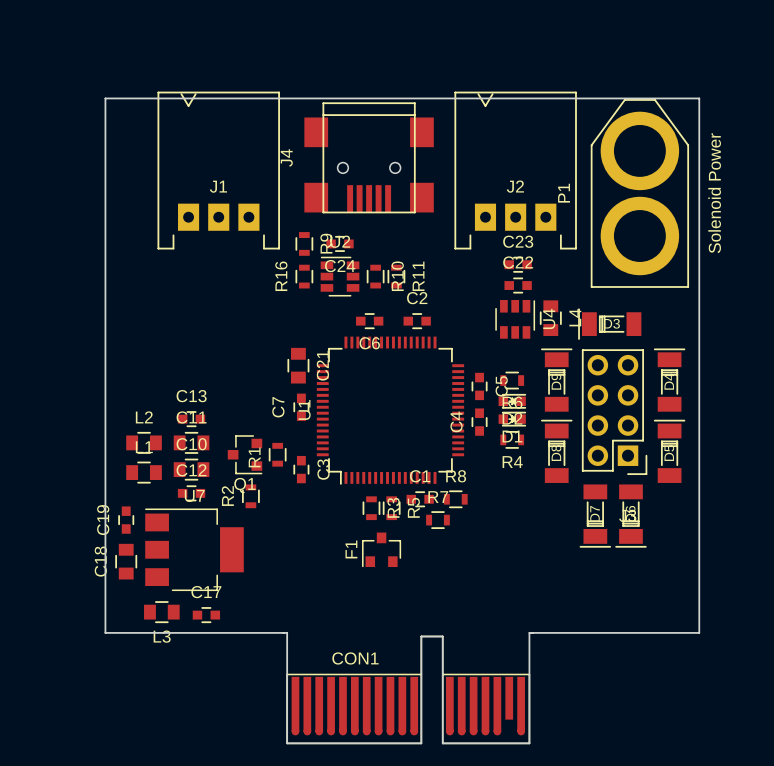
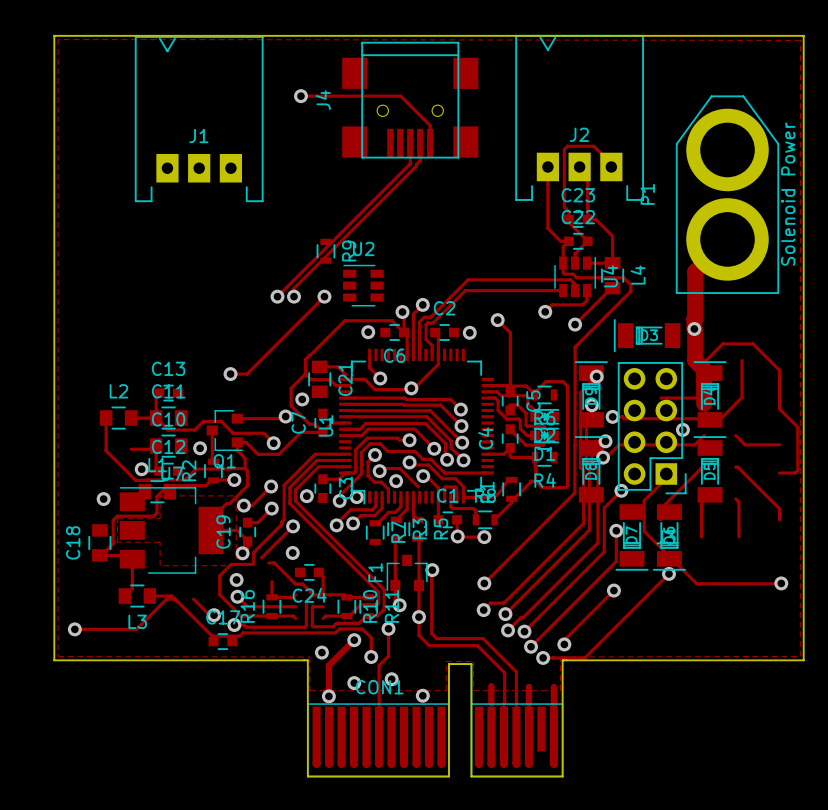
zone outline: none -> (58, 39) (800, 40) (800, 656) (560, 657) (560, 690) (473, 690) (473, 661) (446, 661) (446, 690) (309, 690) (309, 657) (58, 656) (58, 39)
track: none -> (300, 96) (400, 96) (430, 125) (430, 143)
via: none -> (300, 96)
track: none -> (410, 143) (410, 163) (277, 296)
track: none -> (420, 143) (420, 160) (416, 165) (294, 288) (294, 296)
J4 position: (369, 157) -> (410, 100)
track: none -> (547, 166) (547, 228) (560, 241) (568, 241) (563, 246) (563, 272) (572, 274) (576, 277) (623, 277) (630, 284) (630, 291) (575, 347) (574, 492) (484, 583)
track: none -> (579, 166) (587, 174) (587, 219) (595, 219) (612, 236) (612, 263) (586, 263)
track: none -> (611, 166) (611, 163) (593, 146) (567, 146) (564, 149) (564, 207) (568, 211) (568, 222) (587, 241) (575, 253) (575, 263)
J1 position: (218, 170) -> (199, 119)
J2 position: (515, 170) -> (579, 117)
P1 position: (639, 193) -> (727, 194)
P1 value position: Solenoid Power (714, 193) -> Solenoid Power (788, 194)
track: none -> (727, 239) (695, 271) (695, 360)
C24 position: (340, 243) -> (309, 572)
C23 position: (518, 264) -> (578, 219)
R16 position: (304, 276) -> (271, 606)
R10 position: (375, 276) -> (346, 606)
R11 position: (396, 276) -> (368, 606)
track: none -> (612, 288) (575, 324)
track: none -> (563, 290) (465, 290) (433, 322) (426, 324) (426, 339) (432, 345) (432, 354)
track: none -> (575, 290) (575, 284) (570, 279) (468, 279) (430, 317) (424, 317) (419, 322) (419, 354)
track: none -> (586, 290) (586, 300) (582, 304) (552, 304) (545, 311)
C22 position: (518, 285) -> (578, 241)
via: none -> (277, 296)
via: none -> (294, 296)
track: none -> (324, 296) (247, 374) (230, 374)
via: none -> (324, 296)
track: none -> (422, 304) (413, 314) (413, 354)
via: none -> (422, 304)
track: none -> (402, 312) (404, 332)
via: none -> (402, 312)
via: none -> (545, 311)
track: none -> (497, 320) (510, 332) (509, 386)
via: none -> (497, 320)
via: none -> (575, 324)
via: none -> (694, 329)
L4 position: (550, 318) -> (612, 275)
U4 position: (515, 319) -> (575, 276)
via: none -> (368, 332)
track: none -> (404, 332) (391, 320) (344, 320) (305, 359) (305, 374)
track: none -> (404, 332) (407, 335) (407, 354)
track: none -> (435, 332) (438, 335) (438, 364) (413, 389) (374, 389) (364, 379) (345, 379) (345, 374) (337, 366) (319, 366)
via: none -> (469, 332)
track: none -> (369, 354) (369, 367) (380, 378)
track: none -> (695, 360) (706, 360) (722, 343) (753, 343) (779, 370) (779, 409) (797, 427) (797, 470) (795, 472) (779, 472)
track: none -> (695, 360) (704, 369) (704, 403) (698, 398) (660, 398)
track: none -> (742, 360) (742, 397) (720, 418) (624, 418) (622, 416) (612, 416)
via: none -> (230, 374)
track: none -> (305, 374) (291, 388) (291, 405) (309, 424) (314, 424) (322, 432)
track: none -> (305, 374) (311, 379) (330, 379) (335, 385) (345, 385)
track: none -> (596, 376) (580, 392) (580, 467) (583, 470) (583, 523) (504, 603) (490, 603) (483, 610)
via: none -> (596, 376)
via: none -> (380, 378)
track: none -> (487, 385) (509, 386)
track: none -> (509, 386) (526, 386) (535, 394) (535, 392) (545, 381) (563, 381) (567, 386) (567, 485) (565, 487) (542, 487) (535, 481)
via: none -> (411, 388)
track: none -> (487, 391) (497, 391) (501, 395) (527, 395) (527, 403) (535, 411) (535, 416)
track: none -> (159, 393) (156, 396) (156, 418)
track: none -> (345, 398) (450, 399) (460, 409)
track: none -> (487, 398) (495, 398) (498, 400) (498, 410) (506, 419) (518, 419) (520, 428) (527, 435) (535, 435)
via: none -> (302, 399)
track: none -> (345, 404) (440, 405) (461, 426)
track: none -> (509, 404) (517, 404) (526, 413) (527, 426) (544, 427) (544, 443) (525, 445) (510, 429)
track: none -> (591, 405) (591, 415) (586, 420) (586, 465) (589, 468) (589, 530) (505, 614)
via: none -> (591, 405)
via: none -> (460, 409)
track: none -> (345, 410) (430, 410) (462, 442)
track: none -> (285, 416) (283, 418) (237, 418)
via: none -> (285, 416)
track: none -> (345, 416) (426, 416) (451, 441) (451, 447) (463, 460)
via: none -> (612, 416)
track: none -> (106, 418) (106, 450) (135, 480) (185, 479) (196, 469) (245, 468)
track: none -> (131, 418) (156, 418)
track: none -> (156, 418) (168, 429) (194, 429) (203, 421) (221, 421) (233, 433) (263, 433) (273, 443)
track: none -> (345, 423) (332, 423) (322, 432)
via: none -> (461, 426)
track: none -> (345, 429) (360, 429) (365, 423) (425, 423) (445, 443) (445, 458) (447, 459)
via: none -> (682, 429)
track: none -> (212, 430) (212, 460)
track: none -> (322, 432) (300, 432) (279, 454) (257, 454) (246, 442) (237, 442) (237, 450) (245, 458) (245, 468)
C13 position: (191, 419) -> (168, 393)
track: none -> (345, 435) (361, 435) (368, 429) (414, 429) (434, 448)
track: none -> (704, 435) (694, 444) (619, 444) (606, 457) (603, 457)
track: none -> (735, 435) (745, 444) (779, 444)
track: none -> (409, 440) (367, 438) (355, 449) (354, 472) (345, 472) (339, 479) (322, 479)
via: none -> (409, 440)
track: none -> (605, 441) (595, 441) (592, 444) (591, 462) (597, 468) (597, 542) (508, 630)
via: none -> (605, 441)
via: none -> (462, 442)
via: none -> (273, 443)
via: none -> (200, 448)
via: none -> (434, 448)
track: none -> (131, 449) (152, 449) (156, 446) (156, 467) (159, 471) (143, 471) (141, 469)
track: none -> (345, 454) (315, 454) (284, 485) (284, 519) (281, 524) (253, 552) (253, 563) (231, 564) (219, 575) (219, 594) (240, 616) (293, 616) (295, 618)
track: none -> (487, 454) (503, 454) (510, 448) (511, 457) (535, 457) (535, 481)
track: none -> (374, 455) (368, 462) (368, 475) (374, 482) (381, 482) (388, 489) (388, 497)
via: none -> (374, 455)
via: none -> (603, 457)
L2 position: (144, 442) -> (118, 418)
C11 position: (191, 442) -> (168, 418)
track: none -> (345, 460) (316, 460) (289, 487) (289, 503) (378, 592) (378, 603) (360, 604) (349, 616) (325, 616) (323, 618)
via: none -> (447, 459)
via: none -> (463, 460)
track: none -> (409, 462) (412, 465) (428, 465) (442, 478) (455, 478) (463, 486) (463, 497) (494, 497) (502, 488) (502, 486) (511, 480)
via: none -> (409, 462)
track: none -> (345, 466) (318, 466) (295, 489) (295, 501) (384, 589) (384, 609) (377, 616) (366, 616) (358, 623) (336, 623) (333, 626) (313, 626) (312, 607) (323, 606)
track: none -> (704, 467) (660, 508) (660, 519)
track: none -> (735, 467) (779, 508) (779, 519)
track: none -> (245, 468) (247, 470) (247, 485) (211, 519) (211, 530) (237, 530) (247, 541) (247, 549) (242, 553)
via: none -> (141, 469)
track: none -> (379, 471) (382, 468) (399, 468) (418, 486)
via: none -> (379, 471)
Q1 position: (245, 454) -> (224, 430)
R1 position: (277, 454) -> (511, 489)
track: none -> (487, 472) (444, 472) (430, 459) (422, 459) (414, 451) (387, 451) (380, 443) (370, 443) (361, 452) (361, 473) (340, 494) (340, 501)
track: none -> (660, 472) (660, 483) (644, 500) (644, 531) (696, 583) (781, 583)
track: none -> (423, 476) (426, 476) (438, 487) (438, 519)
via: none -> (423, 476)
track: none -> (234, 480) (210, 480) (205, 485) (200, 485)
via: none -> (234, 480)
via: none -> (396, 481)
track: none -> (535, 481) (530, 481) (514, 498) (511, 498) (511, 502) (494, 519) (494, 517)
track: none -> (200, 485) (167, 485) (156, 496) (156, 513) (153, 516) (117, 516) (113, 520) (113, 543) (101, 555)
track: none -> (271, 486) (252, 505) (243, 505)
via: none -> (271, 486)
C10 position: (191, 469) -> (168, 446)
track: none -> (621, 490) (604, 507) (604, 551) (524, 631)
via: none -> (621, 490)
zone outline: none -> (160, 495) (160, 518) (117, 518) (117, 542) (160, 542) (160, 565) (236, 565) (236, 495) (160, 495)
via: none -> (306, 496)
via: none -> (356, 497)
track: none -> (375, 497) (375, 506) (372, 509) (350, 509) (336, 525)
track: none -> (382, 497) (382, 508) (374, 515) (360, 515) (353, 523)
track: none -> (400, 497) (400, 506) (395, 512) (388, 512) (377, 523) (375, 523)
track: none -> (407, 497) (407, 509) (396, 519)
track: none -> (413, 497) (413, 515) (417, 519)
track: none -> (444, 497) (445, 486) (455, 486) (457, 497)
track: none -> (450, 497) (452, 508) (473, 508) (475, 511) (475, 519)
via: none -> (103, 499)
track: none -> (704, 498) (701, 501) (701, 537)
track: none -> (735, 498) (738, 502) (738, 537)
via: none -> (339, 500)
via: none -> (243, 505)
track: none -> (271, 508) (257, 522) (247, 522)
via: none -> (271, 508)
C12 position: (191, 493) -> (168, 471)
R2 position: (250, 496) -> (213, 471)
track: none -> (457, 519) (458, 537) (484, 537)
track: none -> (295, 523) (261, 557)
via: none -> (353, 523)
via: none -> (336, 525)
via: none -> (293, 526)
track: none -> (616, 530) (616, 561) (531, 646)
via: none -> (616, 530)
via: none -> (457, 536)
via: none -> (484, 537)
track: none -> (396, 538) (395, 600) (399, 605)
track: none -> (417, 538) (419, 635) (429, 645) (477, 645) (504, 672) (503, 735)
C19 position: (126, 520) -> (247, 532)
R7 rotation: 0° (437, 520) -> 90° clockwise (375, 532)
R7 position: (437, 520) -> (375, 532)
via: none -> (292, 552)
via: none -> (242, 553)
track: none -> (99, 555) (128, 555) (132, 559) (132, 588) (124, 596)
track: none -> (268, 563) (274, 563) (295, 584) (302, 584) (313, 594)
track: none -> (432, 570) (431, 633) (436, 638) (483, 638) (516, 671) (516, 735)
via: none -> (432, 570)
U7 position: (194, 549) -> (171, 530)
track: none -> (318, 572) (323, 576) (323, 594)
track: none -> (668, 573) (584, 657) (543, 657)
via: none -> (668, 573)
via: none -> (236, 579)
track: none -> (271, 581) (271, 597) (293, 597) (295, 594)
via: none -> (484, 583)
via: none -> (781, 583)
C18 position: (126, 561) -> (99, 542)
track: none -> (613, 590) (564, 640) (564, 644)
via: none -> (613, 590)
track: none -> (313, 594) (306, 601) (305, 627) (246, 627) (244, 625) (234, 625)
track: none -> (313, 594) (368, 597)
track: none -> (149, 596) (171, 596) (174, 599)
track: none -> (237, 596) (247, 606) (295, 606)
via: none -> (237, 596)
track: none -> (193, 599) (209, 615) (214, 615)
via: none -> (399, 605)
via: none -> (483, 610)
via: none -> (505, 614)
via: none -> (214, 615)
via: none -> (419, 617)
via: none -> (234, 625)
track: none -> (388, 628) (388, 656) (379, 665) (379, 735)
via: none -> (388, 628)
track: none -> (74, 629) (136, 629) (166, 599) (175, 599) (212, 636) (239, 636) (242, 632) (335, 632) (339, 629) (362, 629) (371, 637) (371, 657)
via: none -> (74, 629)
via: none -> (508, 630)
via: none -> (524, 631)
L3 position: (161, 612) -> (137, 596)
track: none -> (354, 640) (328, 665) (328, 696)
via: none -> (354, 640)
via: none -> (564, 644)
via: none -> (531, 646)
via: none -> (321, 652)
via: none -> (371, 657)
via: none -> (543, 657)
board edge: (105, 632) (105, 98) (699, 98) (699, 632) -> (116, 660) (54, 660) (54, 35) (803, 35) (803, 660) (741, 660)
via: none -> (391, 679)
via: none -> (354, 683)
track: none -> (491, 686) (491, 703)
track: none -> (528, 687) (528, 735)
track: none -> (553, 687) (553, 735)
via: none -> (422, 695)
via: none -> (328, 696)

